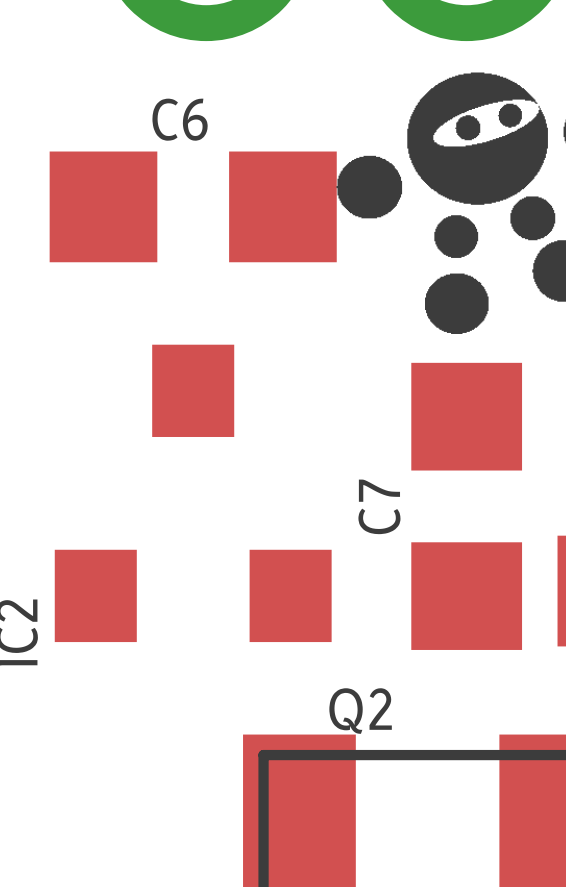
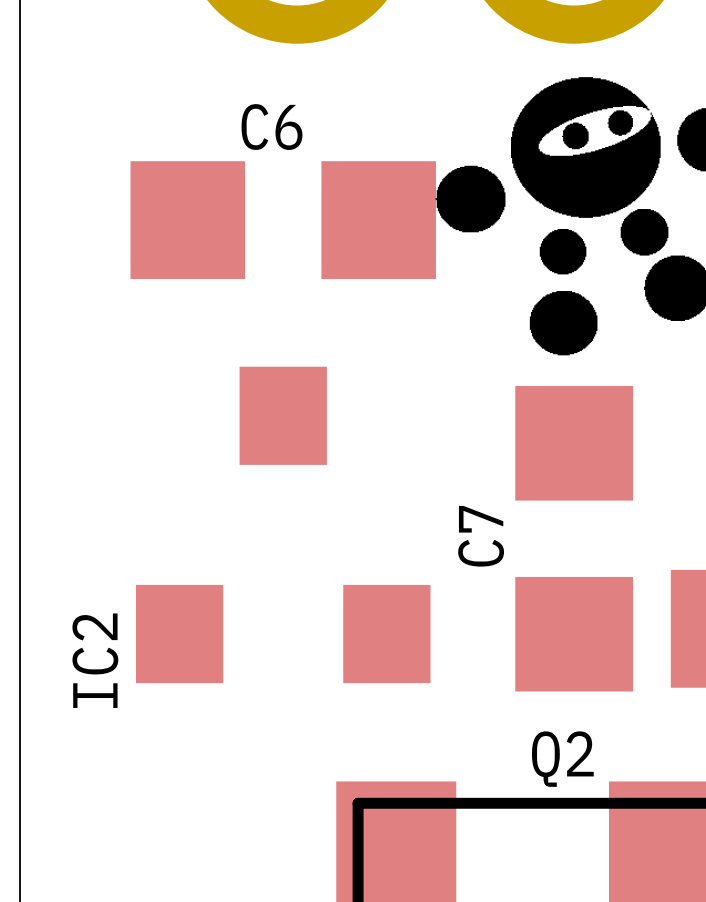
Q2 name position: Q2 (360, 711) -> Q2 (562, 759)

